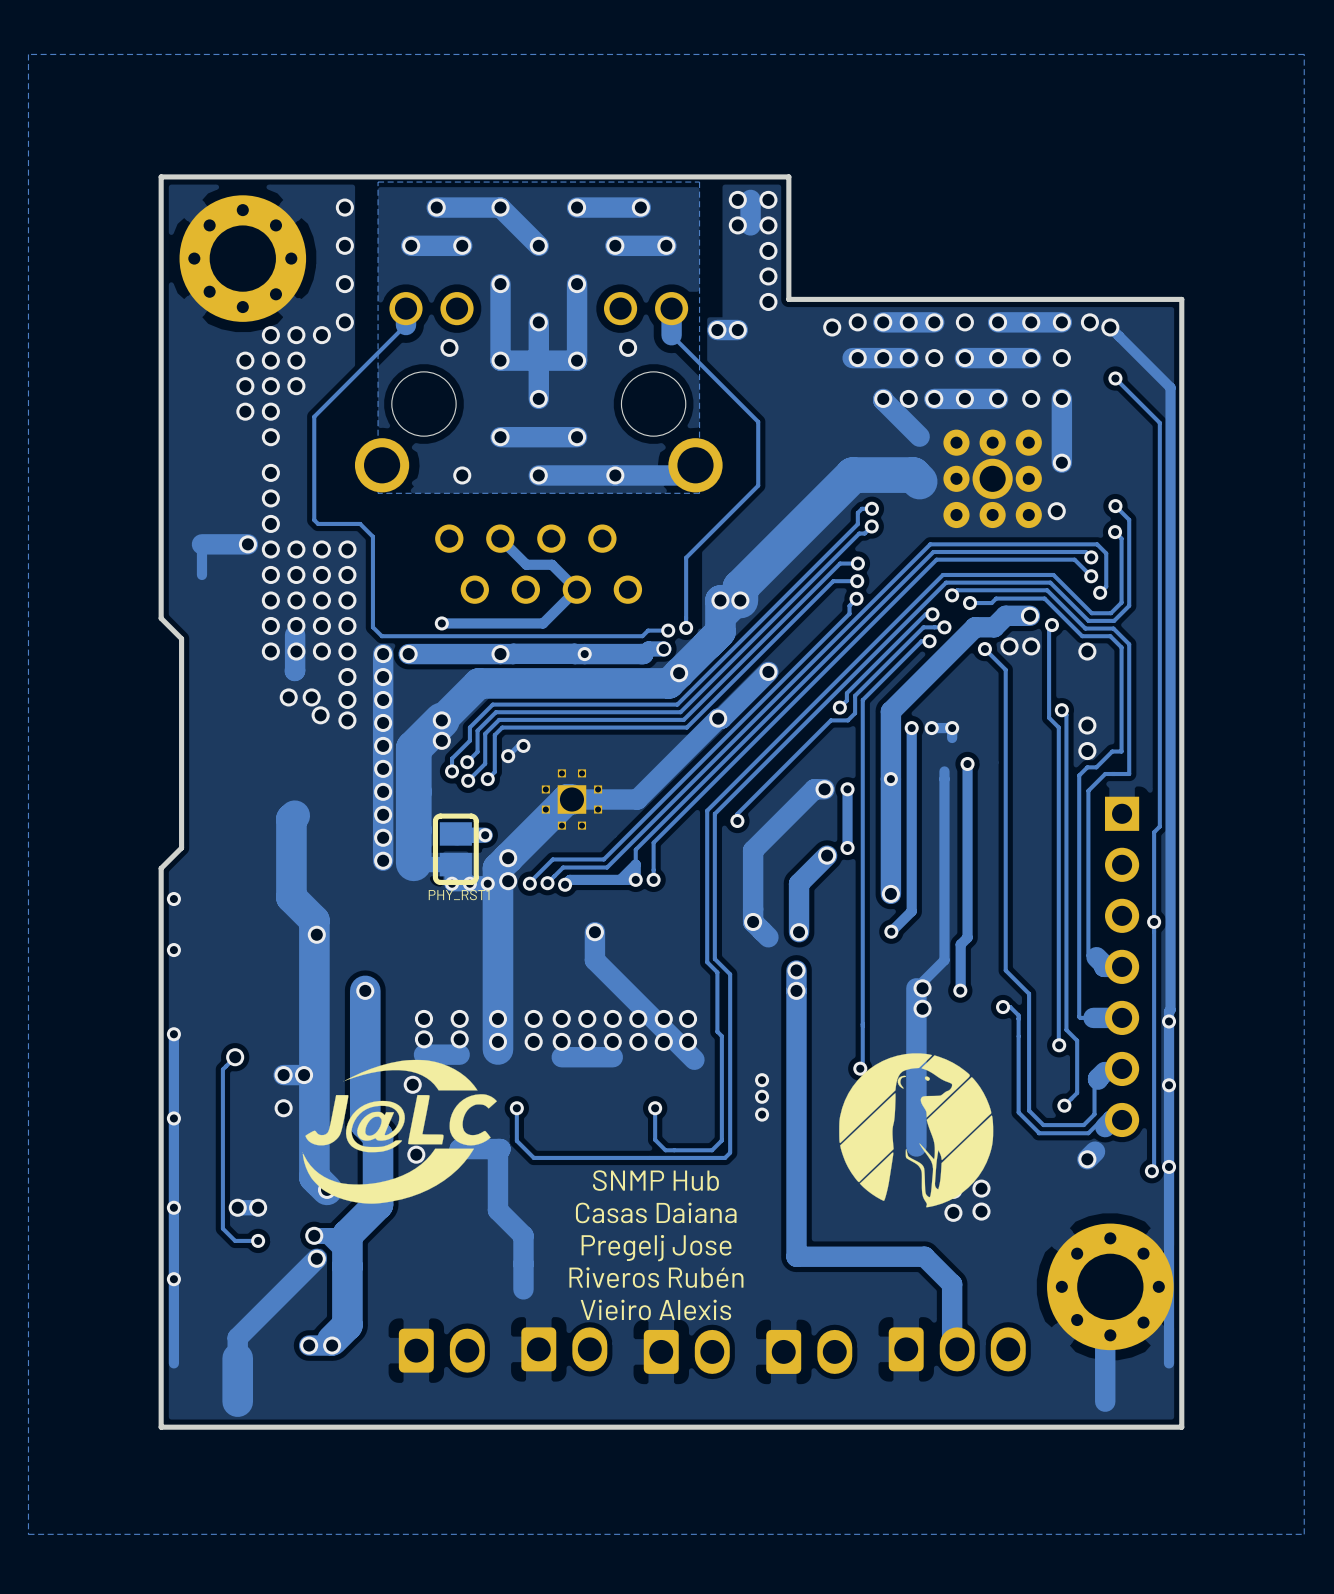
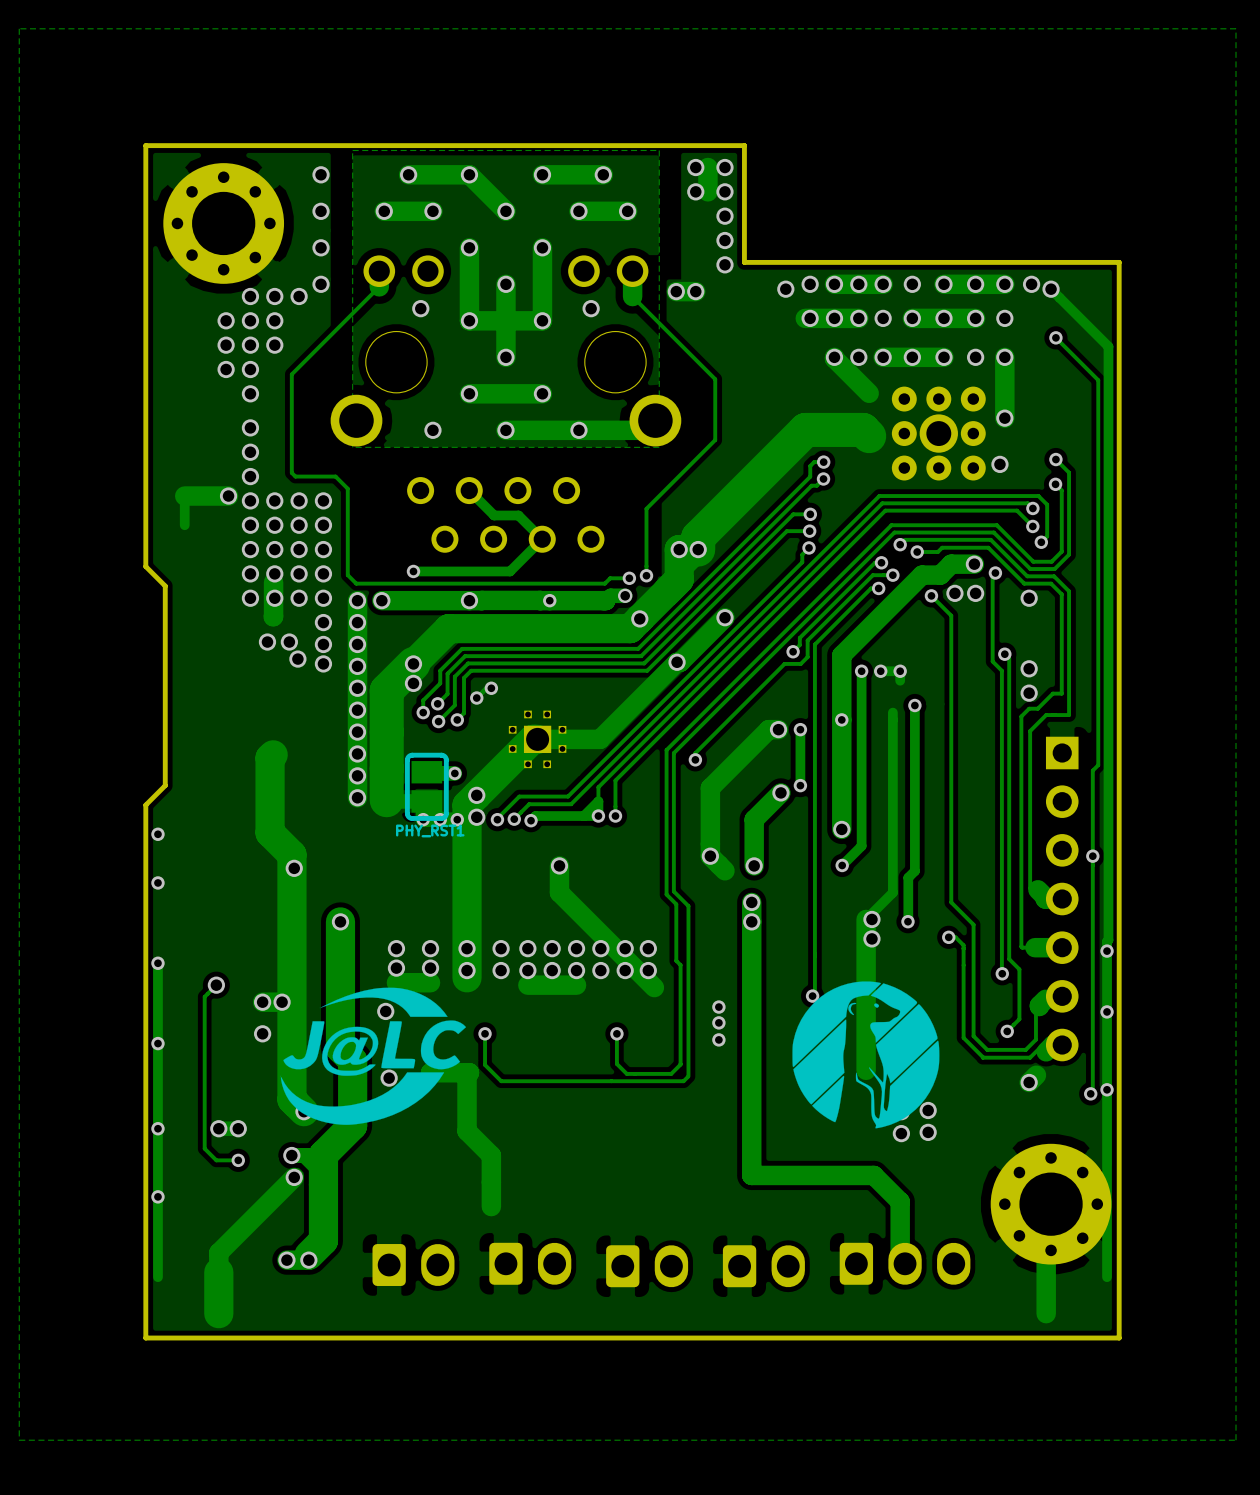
text: SNMP Hub (655, 1180) -> none
text: Casas Daiana (656, 1212) -> none
text: Pregelj Jose (656, 1248) -> none
text: Riveros Rubén (656, 1277) -> none
text: Vieiro Alexis (655, 1309) -> none

